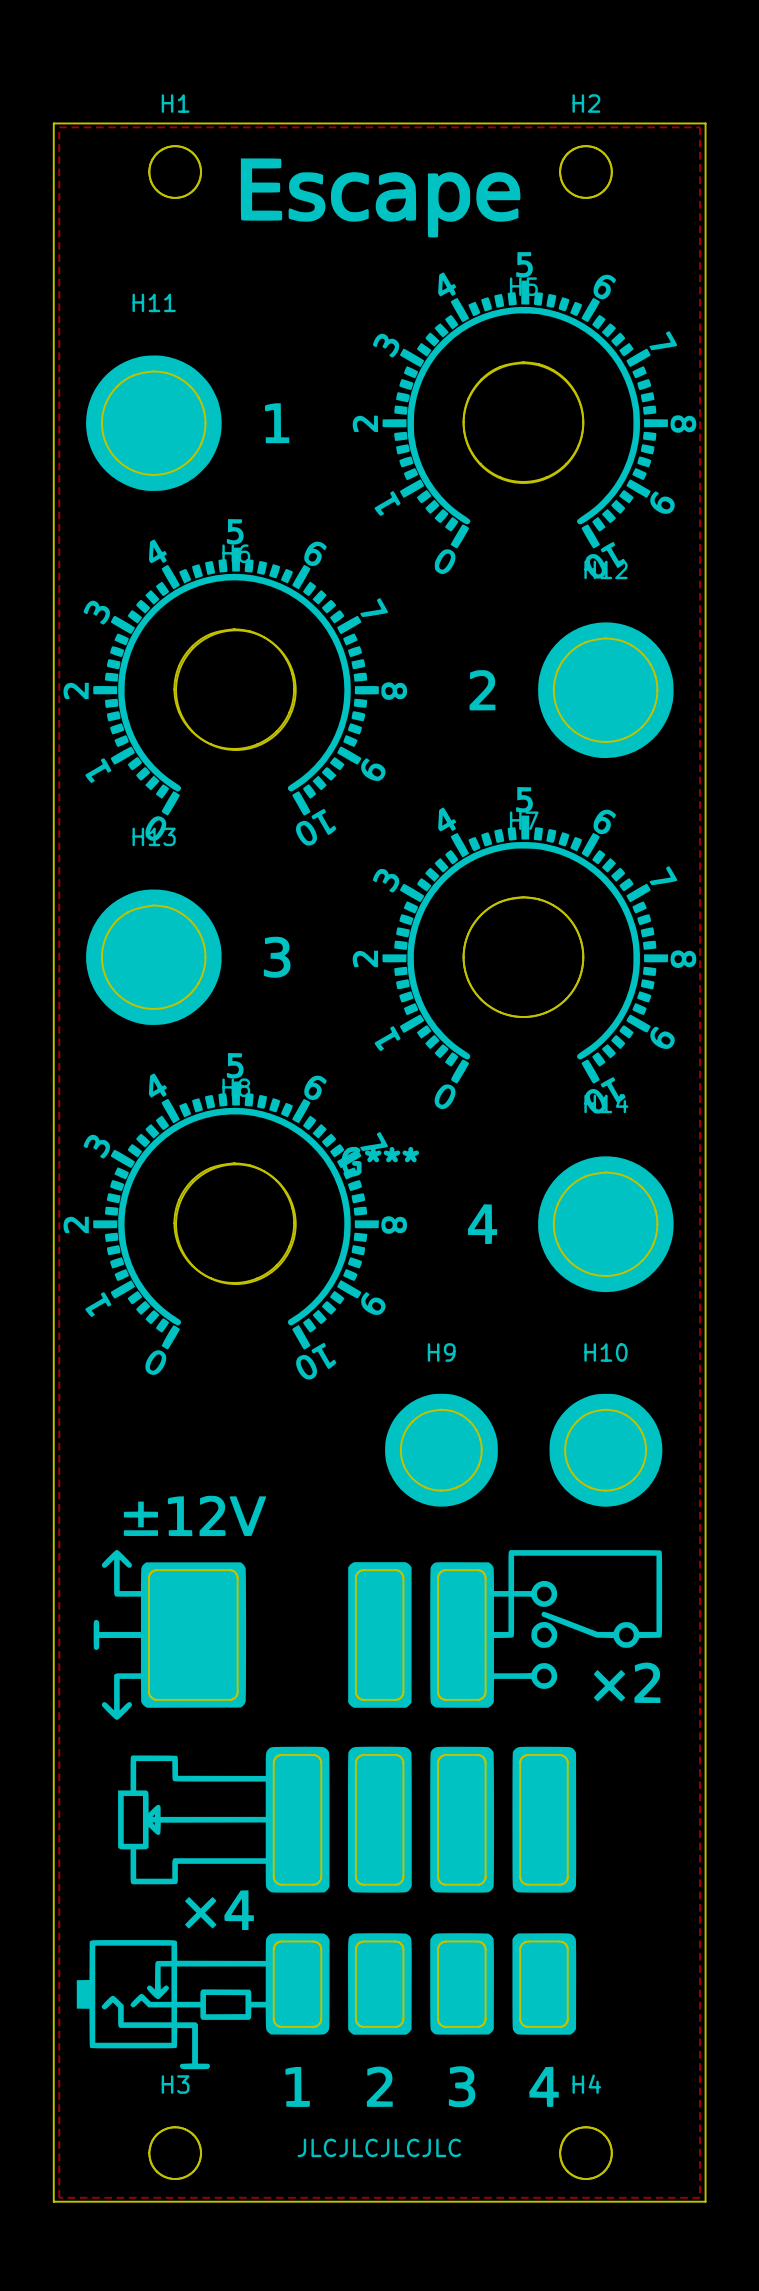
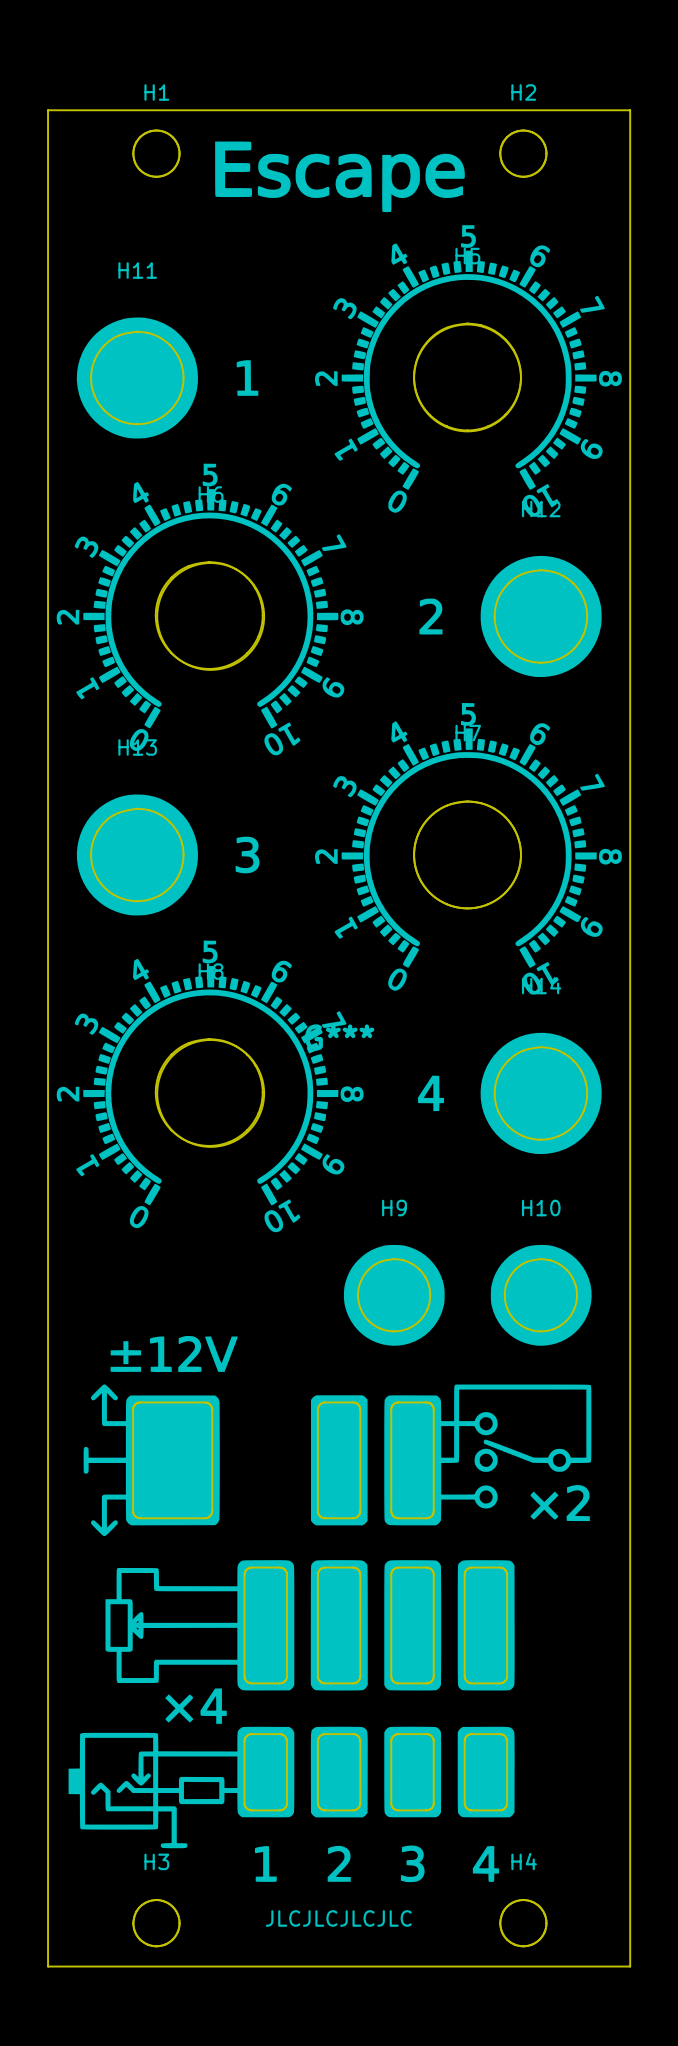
zone outline: (59, 127) (59, 2197) (700, 2197) (700, 127) (59, 127) -> none

